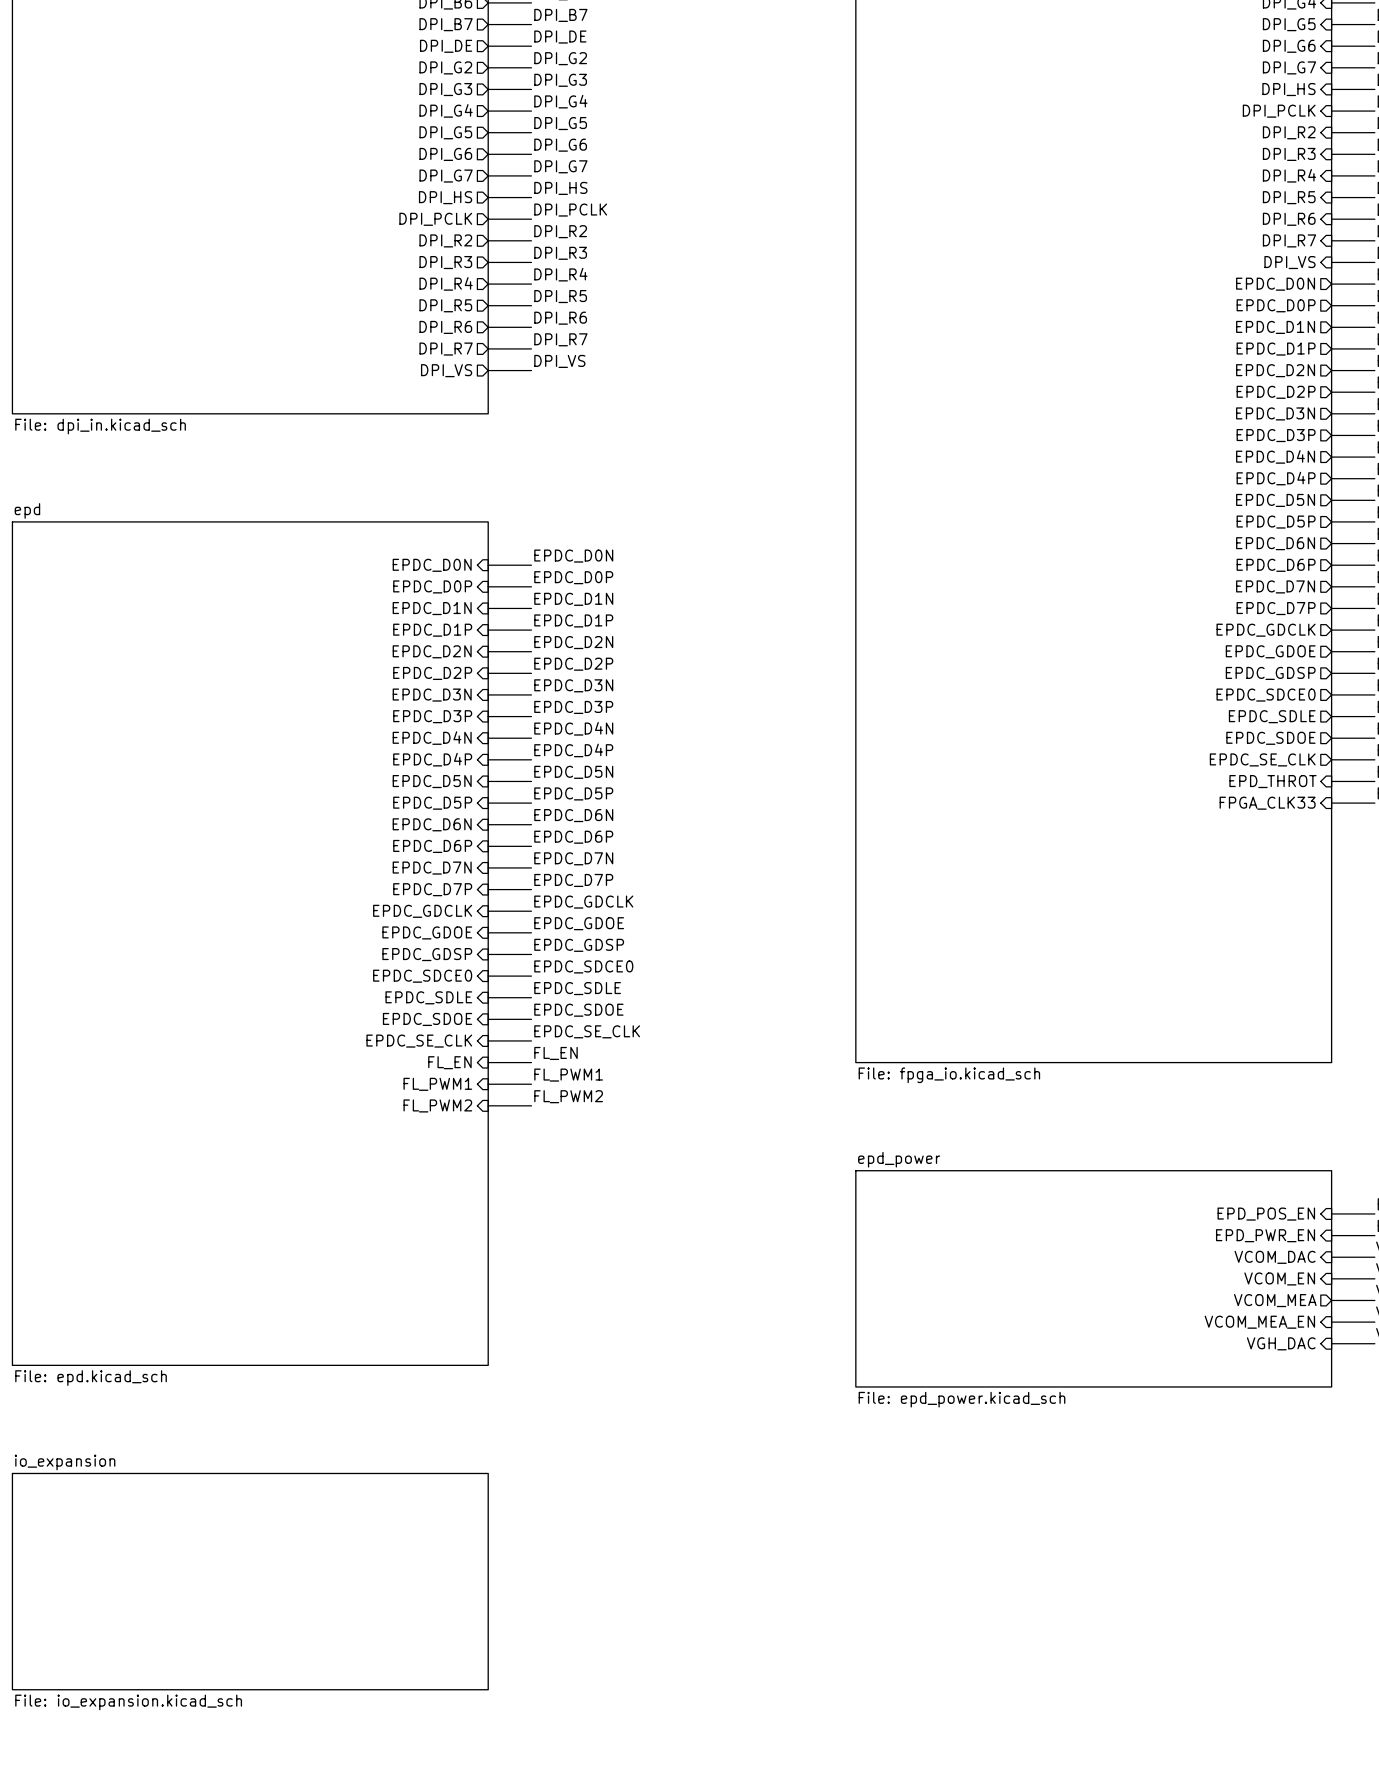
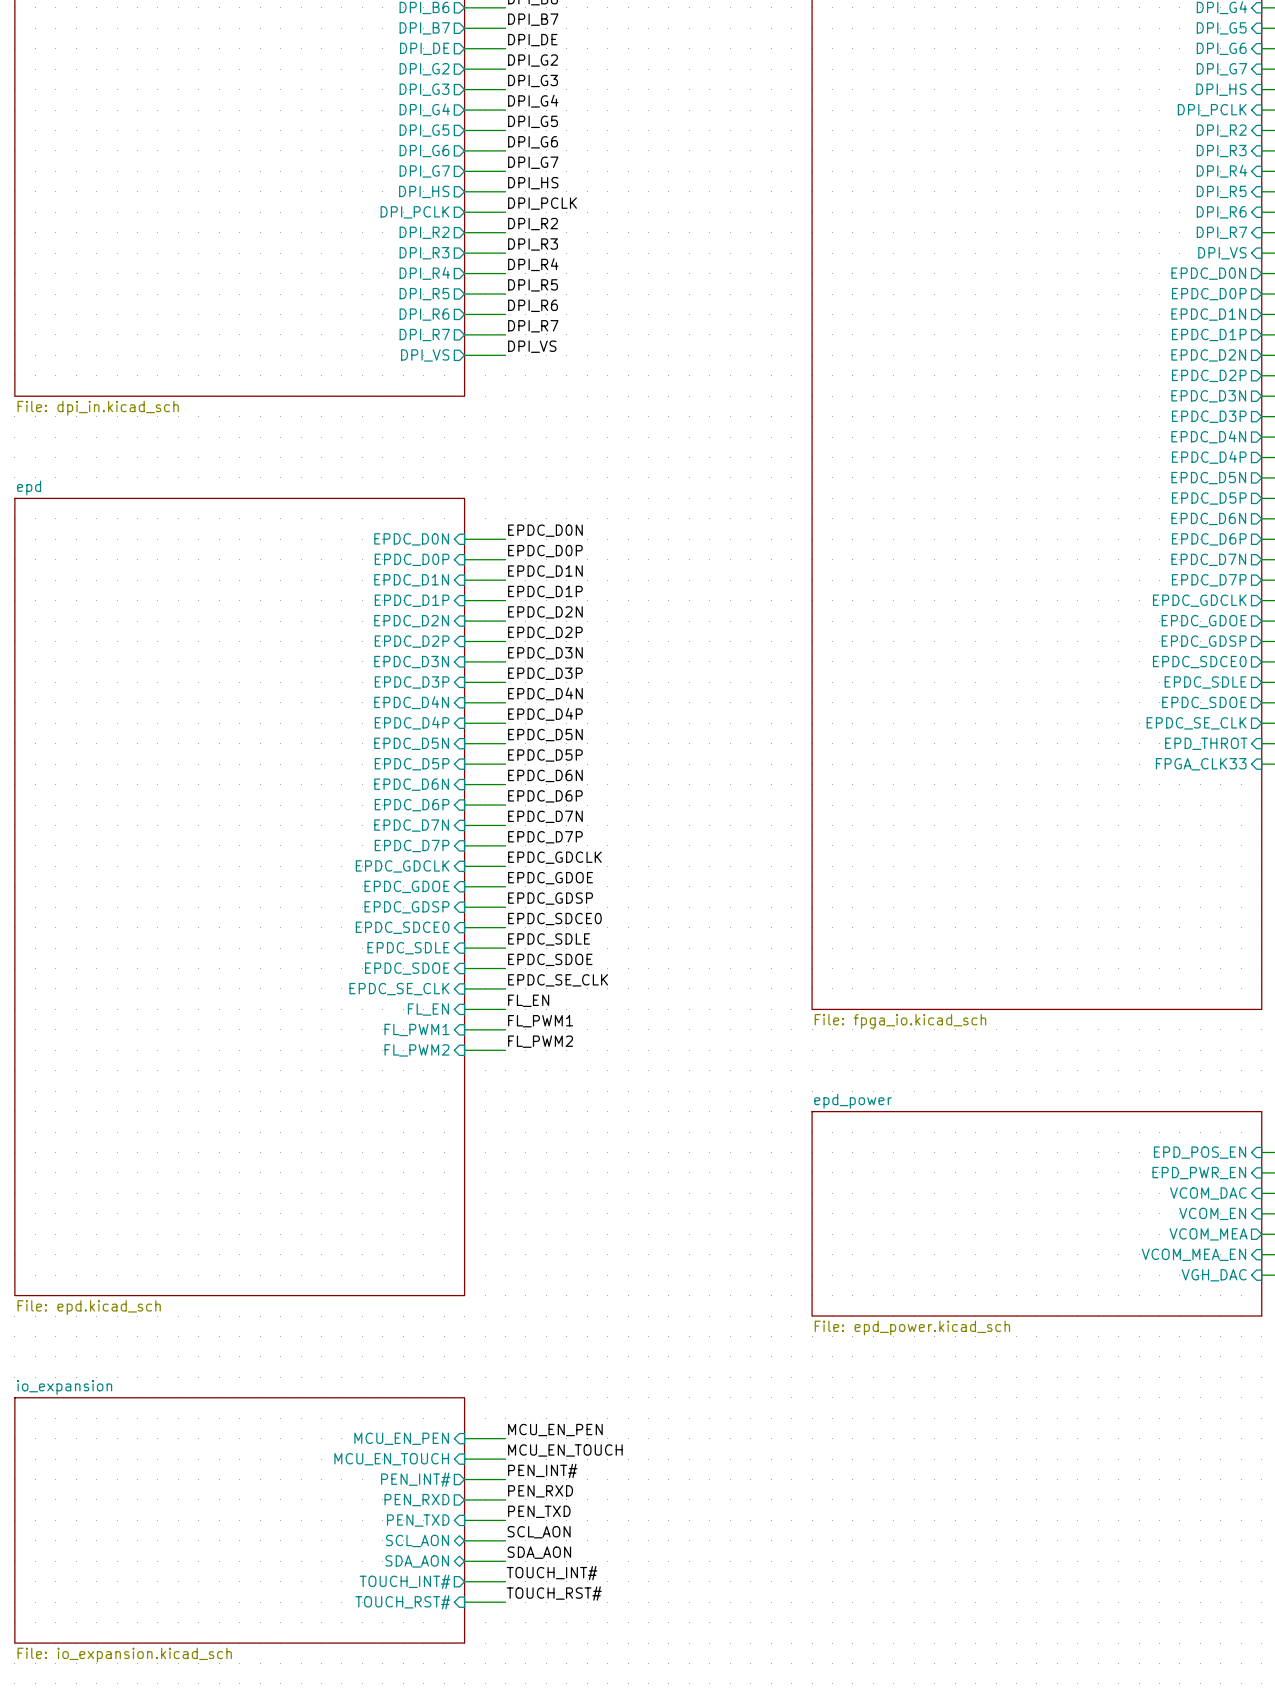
label: none -> MCU_EN_PEN (555, 1430)
sheet pin: none -> MCU_EN_PEN (401, 1438)
wire: none -> (464, 1438) (505, 1438)
label: none -> MCU_EN_TOUCH (565, 1450)
sheet pin: none -> MCU_EN_TOUCH (391, 1459)
wire: none -> (464, 1459) (505, 1459)
label: none -> PEN_INT# (542, 1470)
wire: none -> (464, 1479) (505, 1479)
sheet pin: none -> PEN_INT# (415, 1479)
label: none -> PEN_RXD (540, 1491)
sheet io_expansion: File: io_expansion.kicad_sch (250, 1581) -> none
sheet pin: none -> PEN_RXD (416, 1500)
wire: none -> (464, 1499) (505, 1499)
label: none -> PEN_TXD (539, 1511)
sheet io_expansion: none -> File: io_expansion.kicad_sch (239, 1520)
sheet pin: none -> PEN_TXD (418, 1520)
wire: none -> (464, 1520) (505, 1520)
label: none -> SCL_AON (539, 1532)
sheet pin: none -> SCL_AON (417, 1540)
wire: none -> (464, 1540) (505, 1540)
label: none -> SDA_AON (539, 1552)
sheet pin: none -> SDA_AON (417, 1561)
wire: none -> (464, 1561) (505, 1561)
label: none -> TOUCH_INT# (552, 1573)
sheet pin: none -> TOUCH_INT# (405, 1581)
wire: none -> (464, 1581) (505, 1581)
label: none -> TOUCH_RST# (554, 1593)
sheet pin: none -> TOUCH_RST# (402, 1602)
wire: none -> (464, 1602) (505, 1602)

